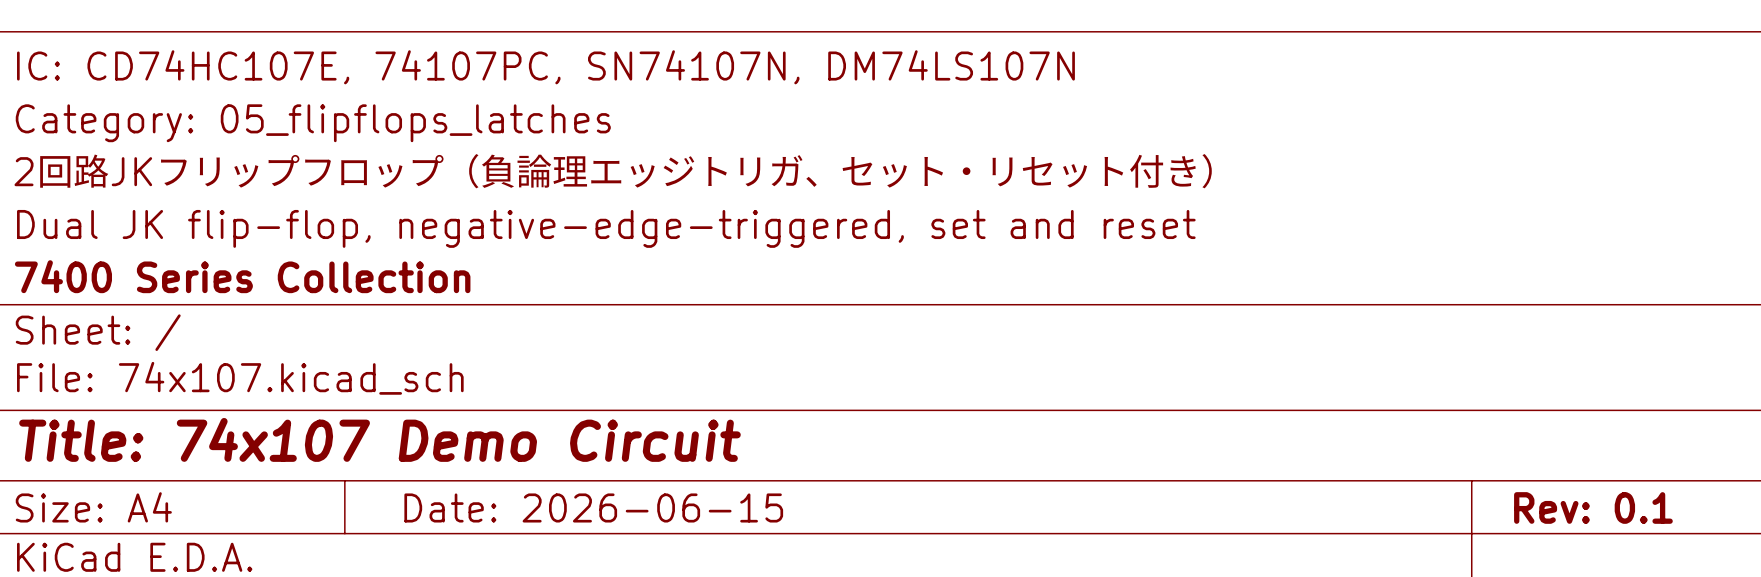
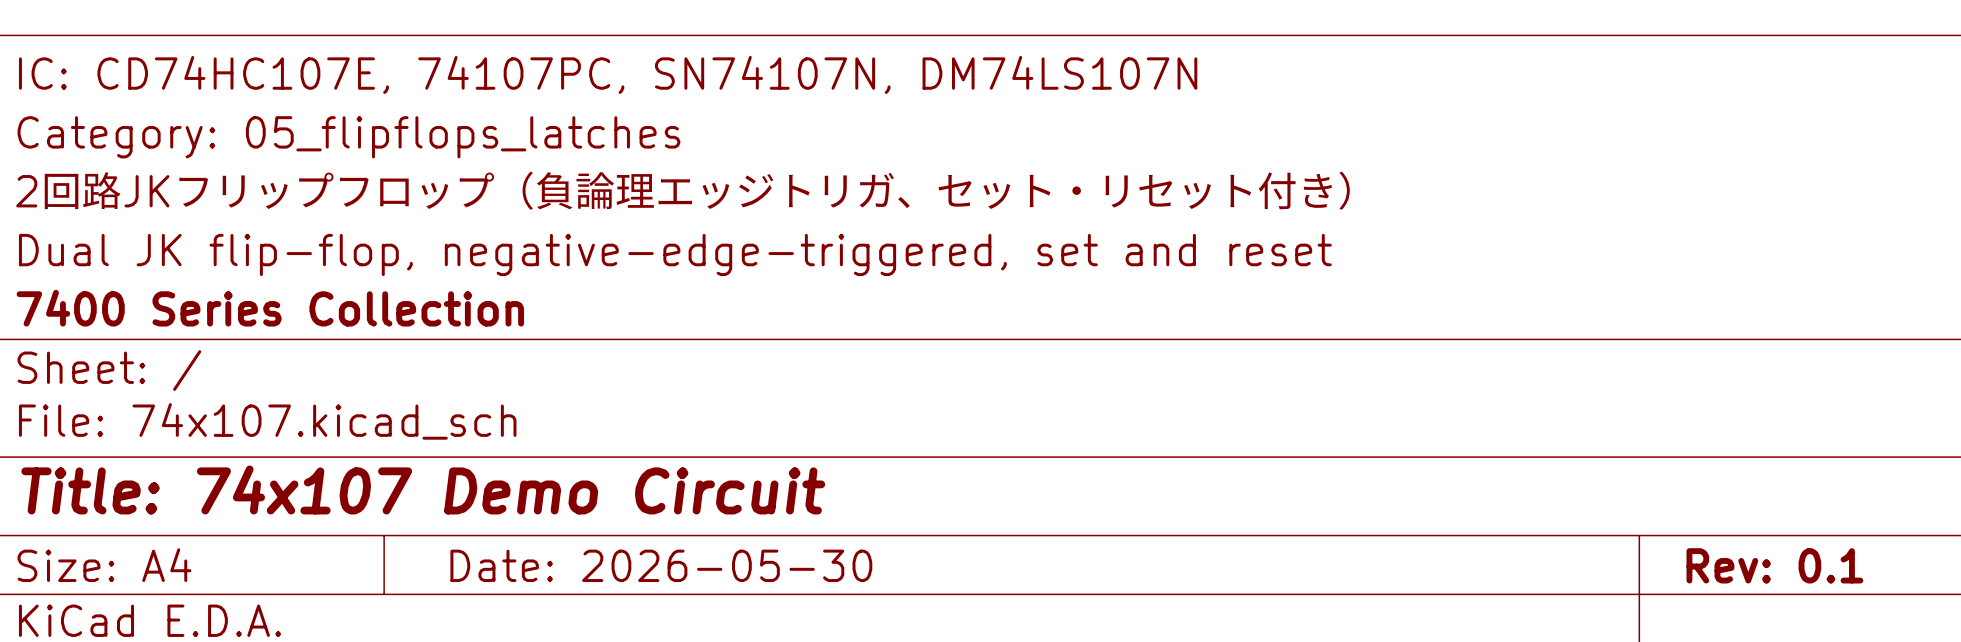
title block: Date: 2026-06-15 (593, 507) -> Date: 2026-05-30 (661, 565)

